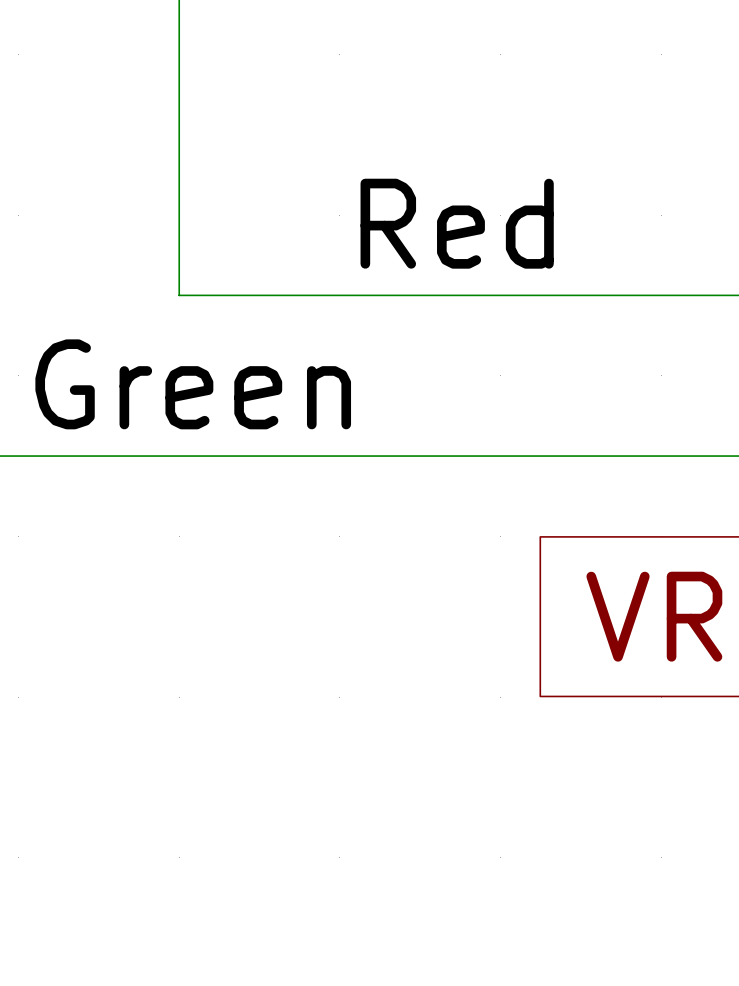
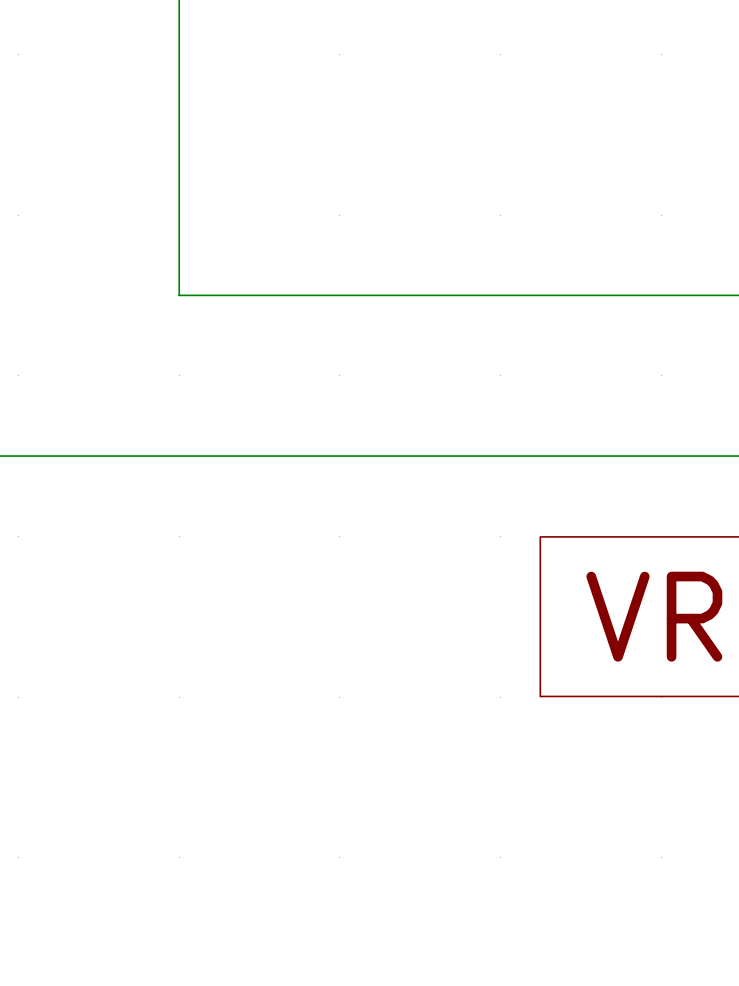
label: Red (457, 223) -> none
label: Green (193, 384) -> none

